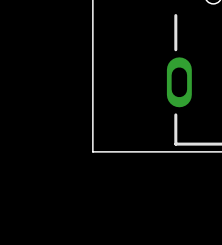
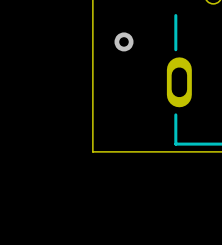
via: none -> (124, 41)

